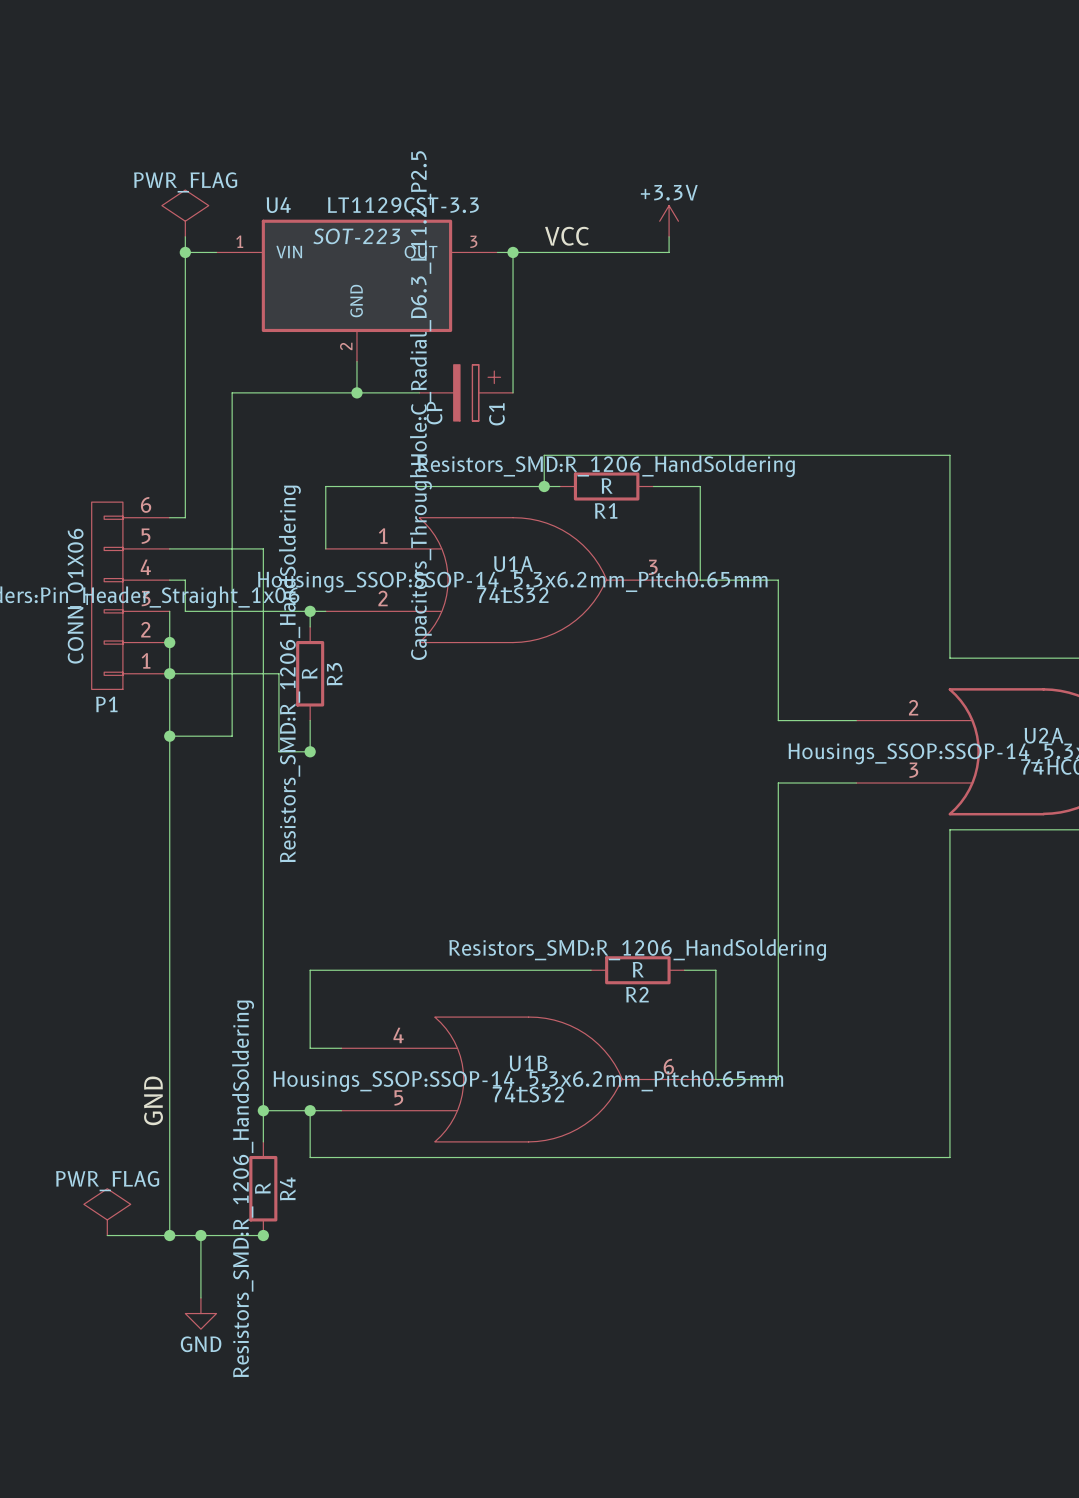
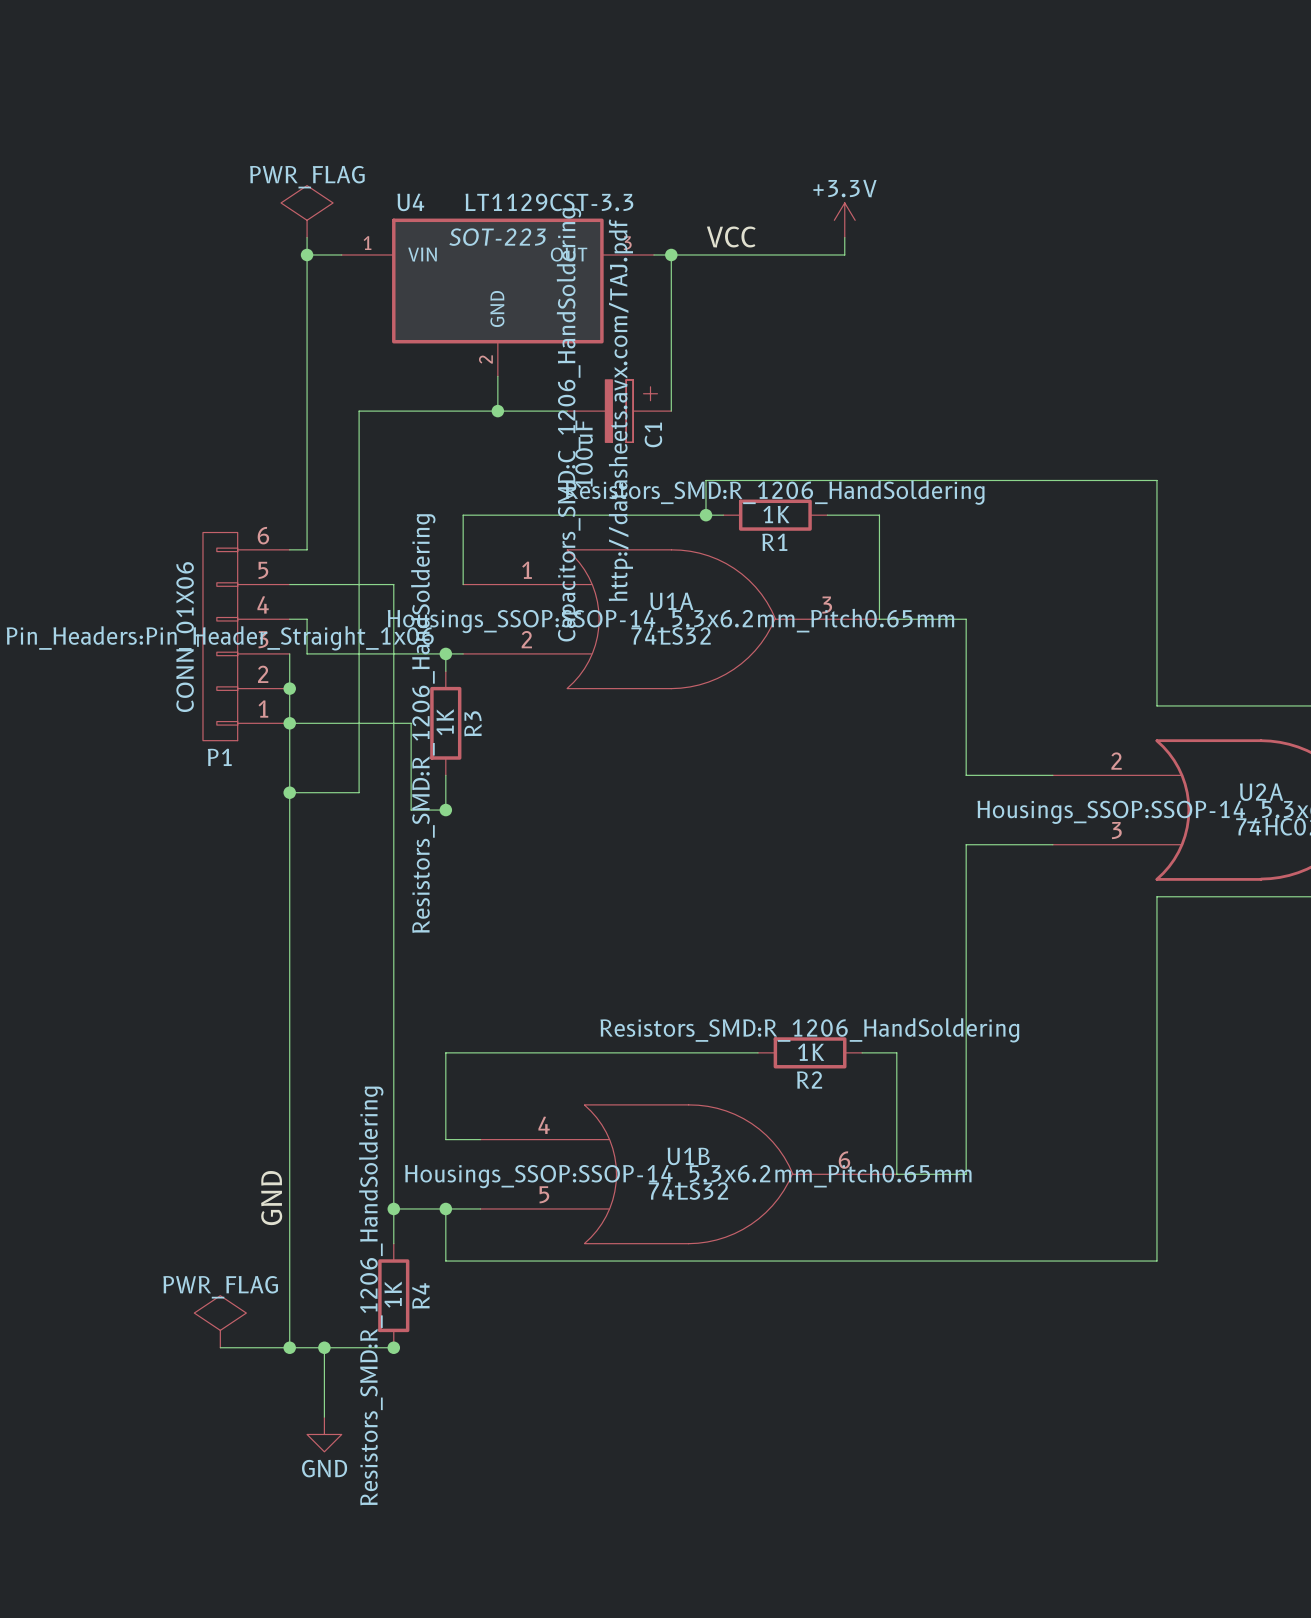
C1 text: none -> http://datasheets.avx.com/TAJ.pdf (620, 410)
C1 text: Capacitors_ThroughHole:C_Radial_D6.3_L11.2_P2.5 (420, 405) -> Capacitors_SMD:C_1206_HandSoldering (568, 424)
C1 value: CP (434, 413) -> 100uF (584, 454)
R1 value: R (607, 485) -> 1K (776, 514)
R3 value: R (309, 673) -> 1K (445, 722)
R2 value: R (638, 969) -> 1K (811, 1052)
R4 value: R (262, 1188) -> 1K (393, 1294)

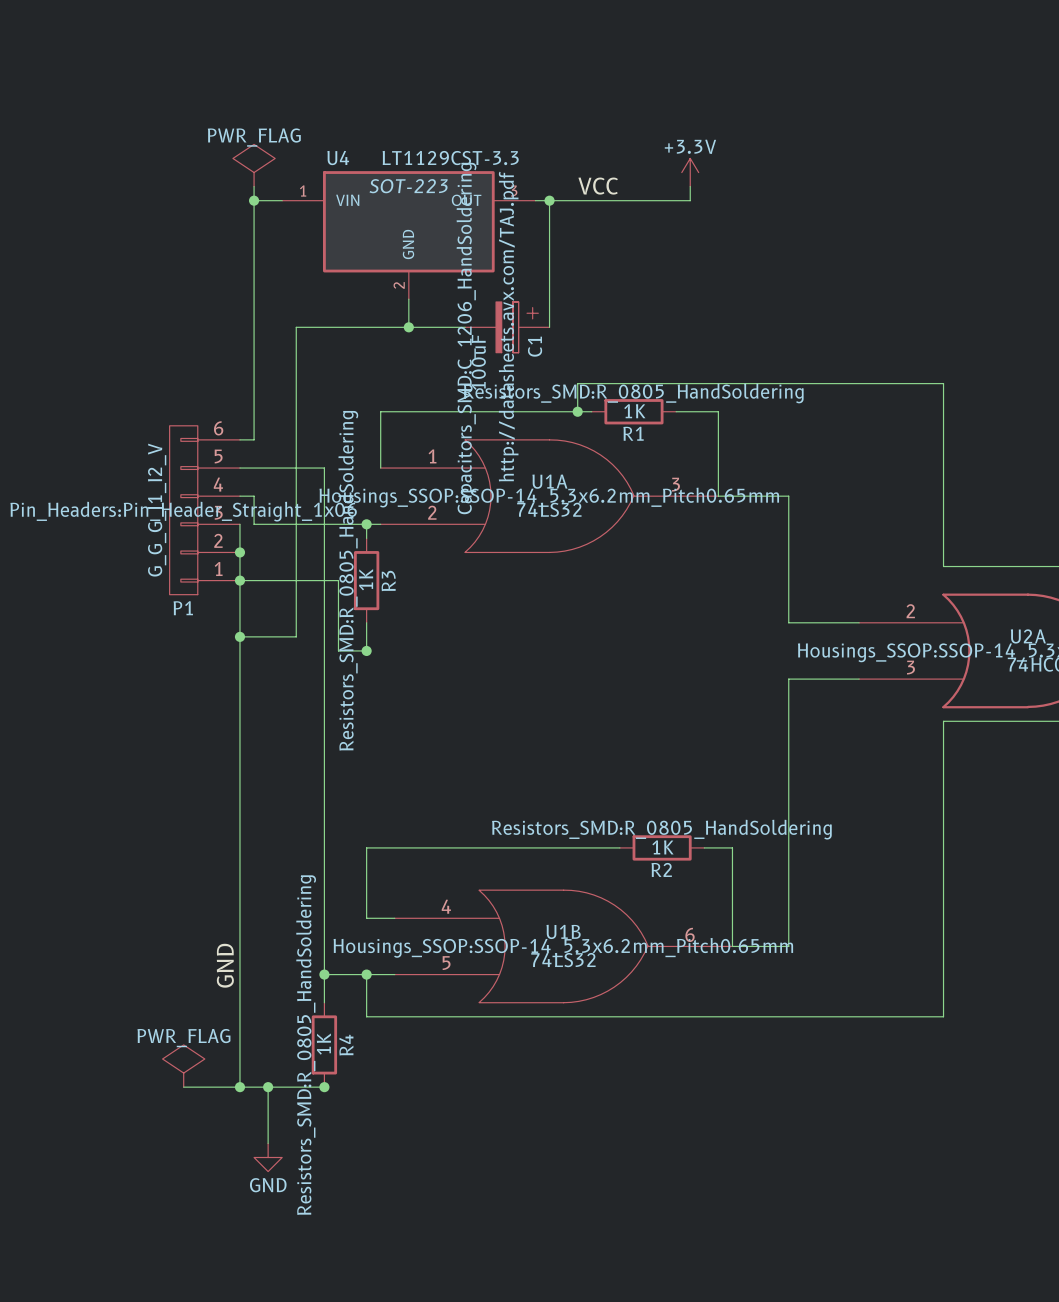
R1 text: Resistors_SMD:R_1206_HandSoldering (775, 492) -> Resistors_SMD:R_0805_HandSoldering (633, 393)
P1 value: CONN_01X06 (187, 637) -> G_G_G_I1_I2_V (157, 510)
R3 text: Resistors_SMD:R_1206_HandSoldering (423, 723) -> Resistors_SMD:R_0805_HandSoldering (348, 580)
R2 text: Resistors_SMD:R_1206_HandSoldering (809, 1030) -> Resistors_SMD:R_0805_HandSoldering (661, 829)
R4 text: Resistors_SMD:R_1206_HandSoldering (371, 1295) -> Resistors_SMD:R_0805_HandSoldering (306, 1045)

